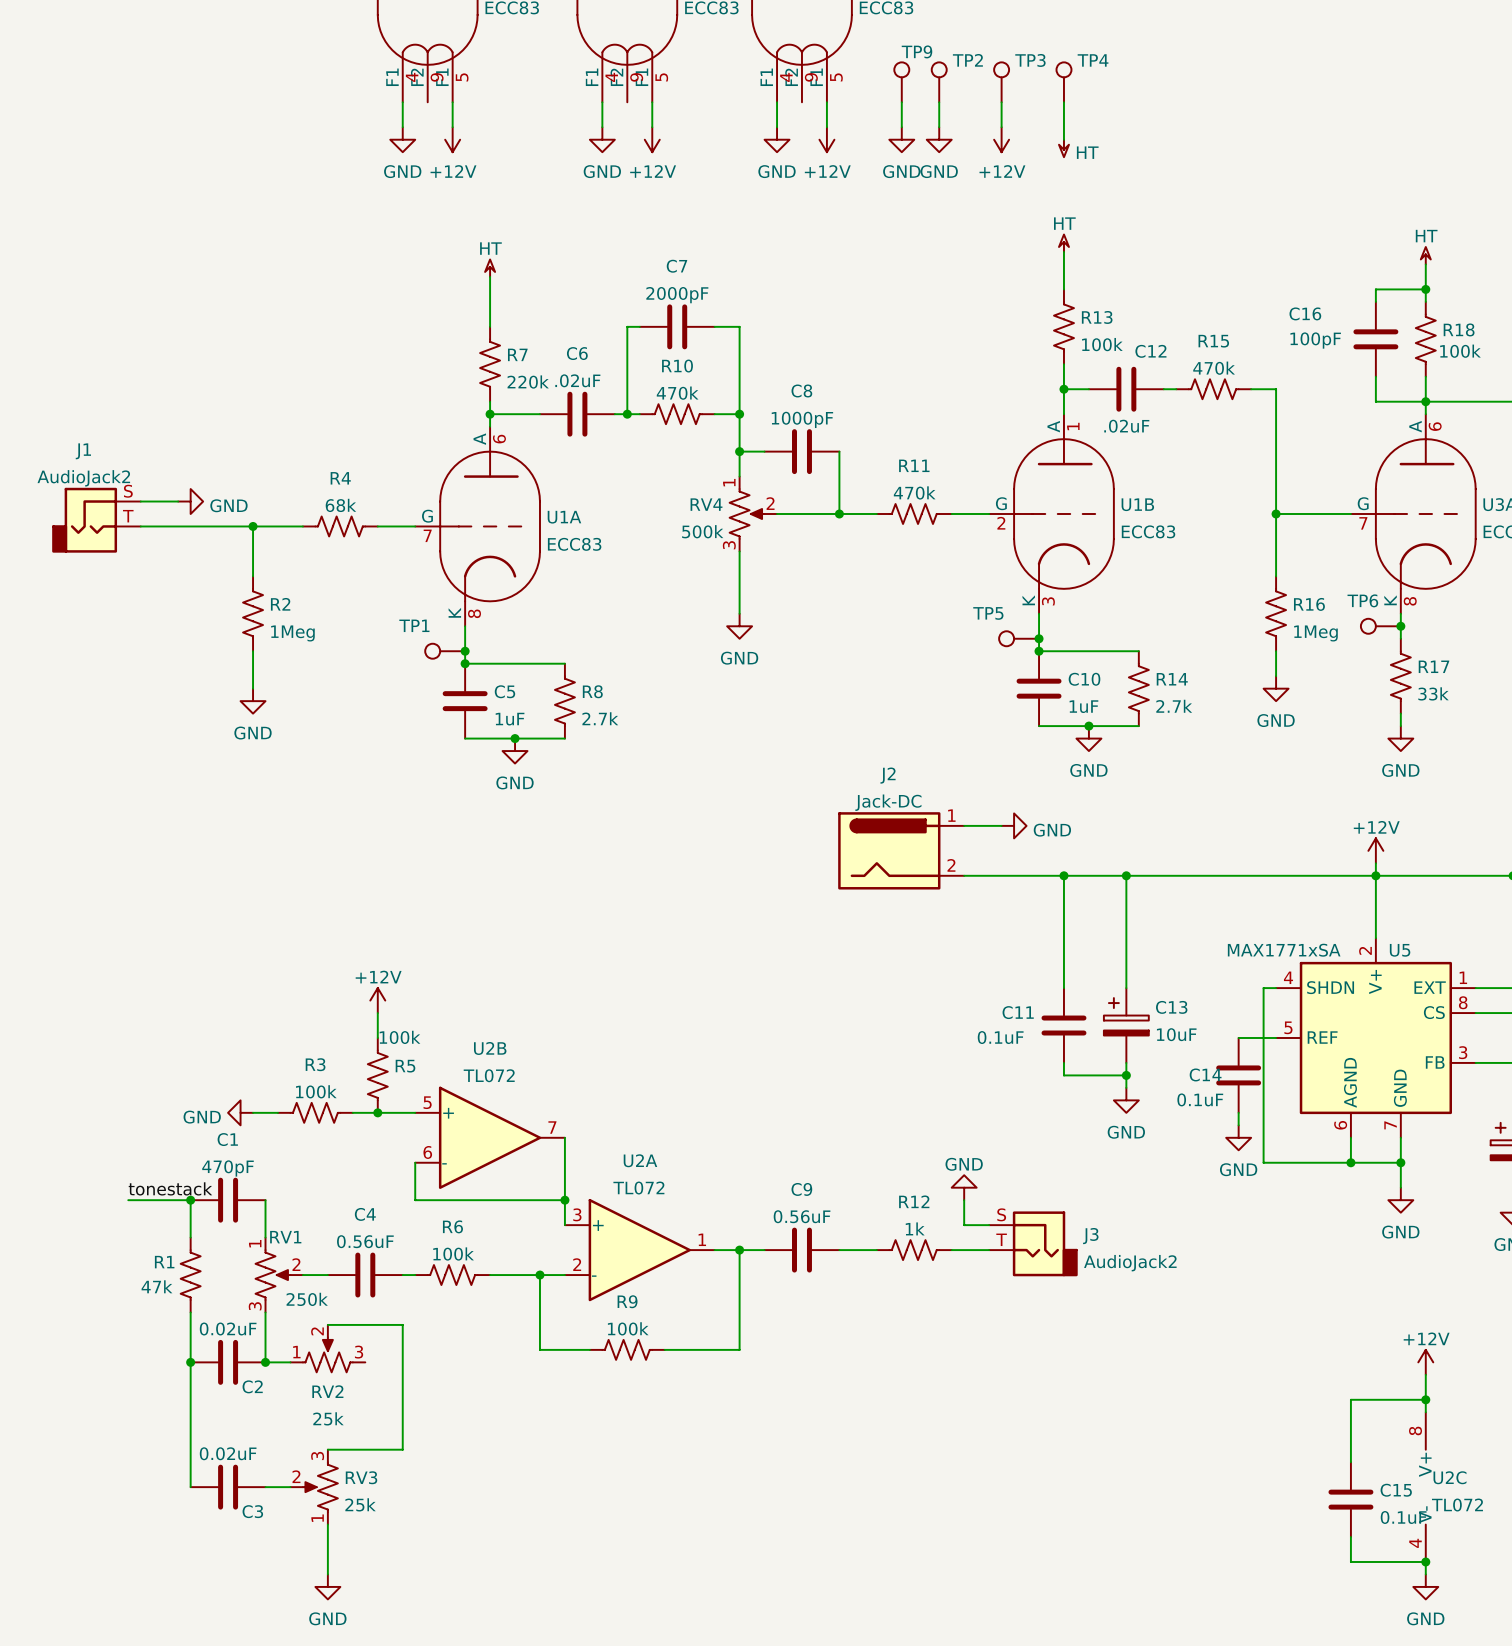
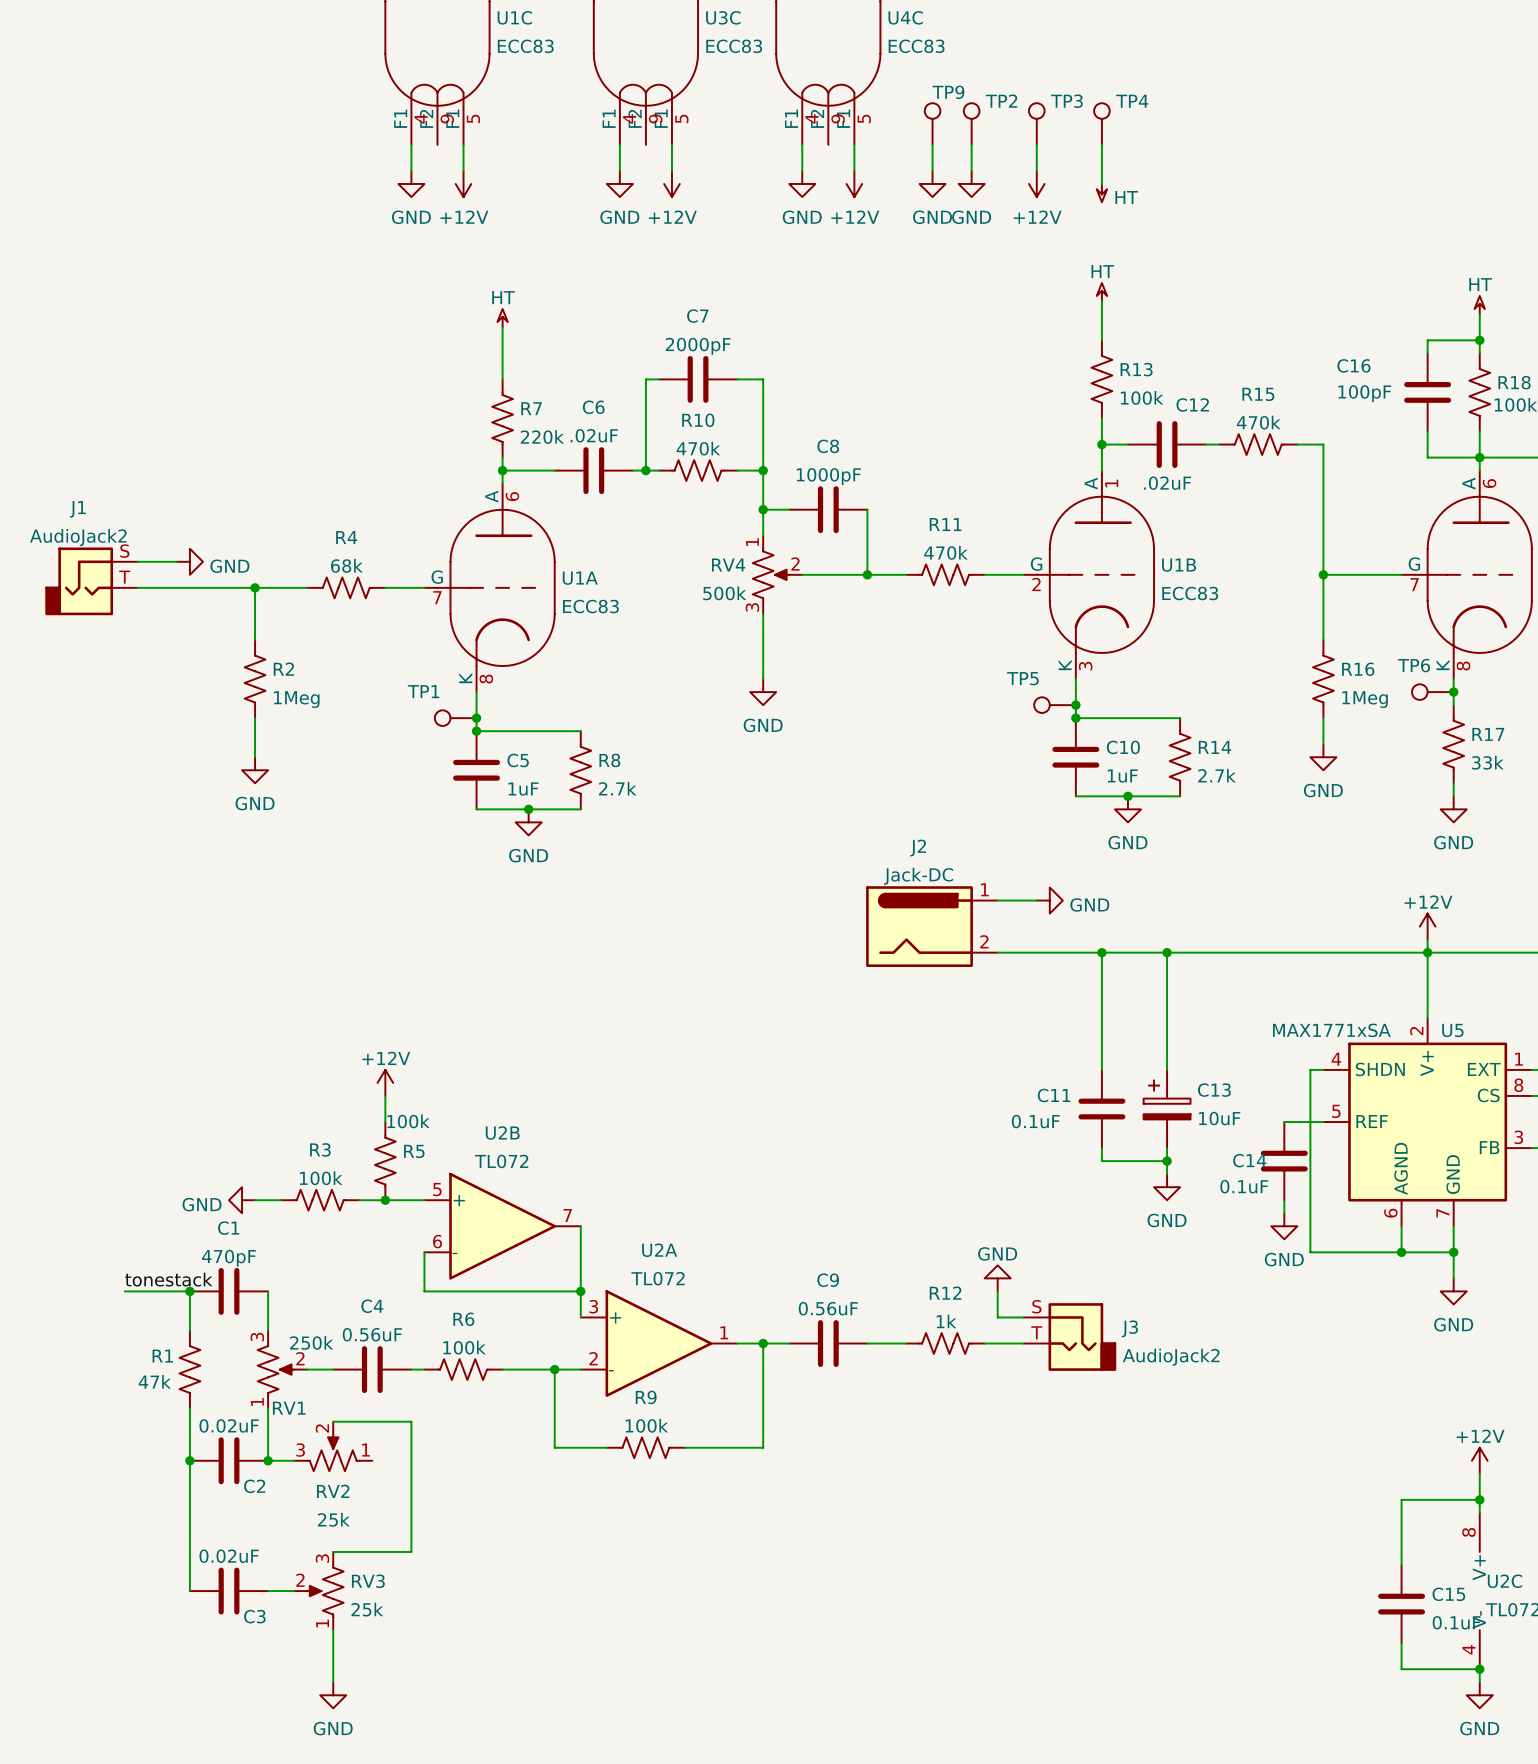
RV1 flip: as is (272, 1275) -> up-down (275, 1369)
RV2 flip: as is (327, 1354) -> left-right (333, 1452)

